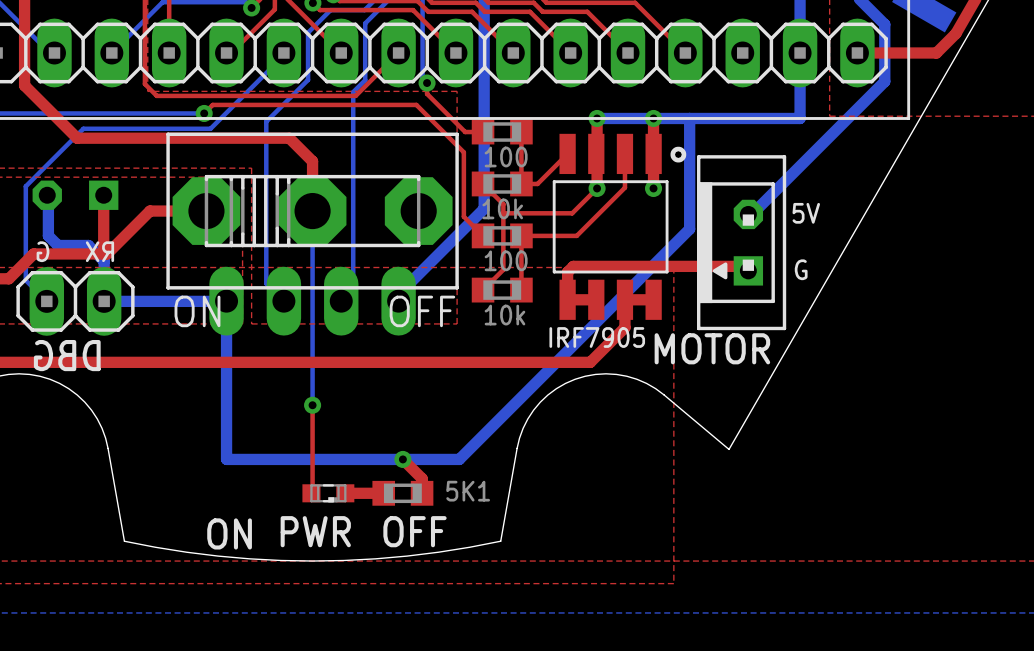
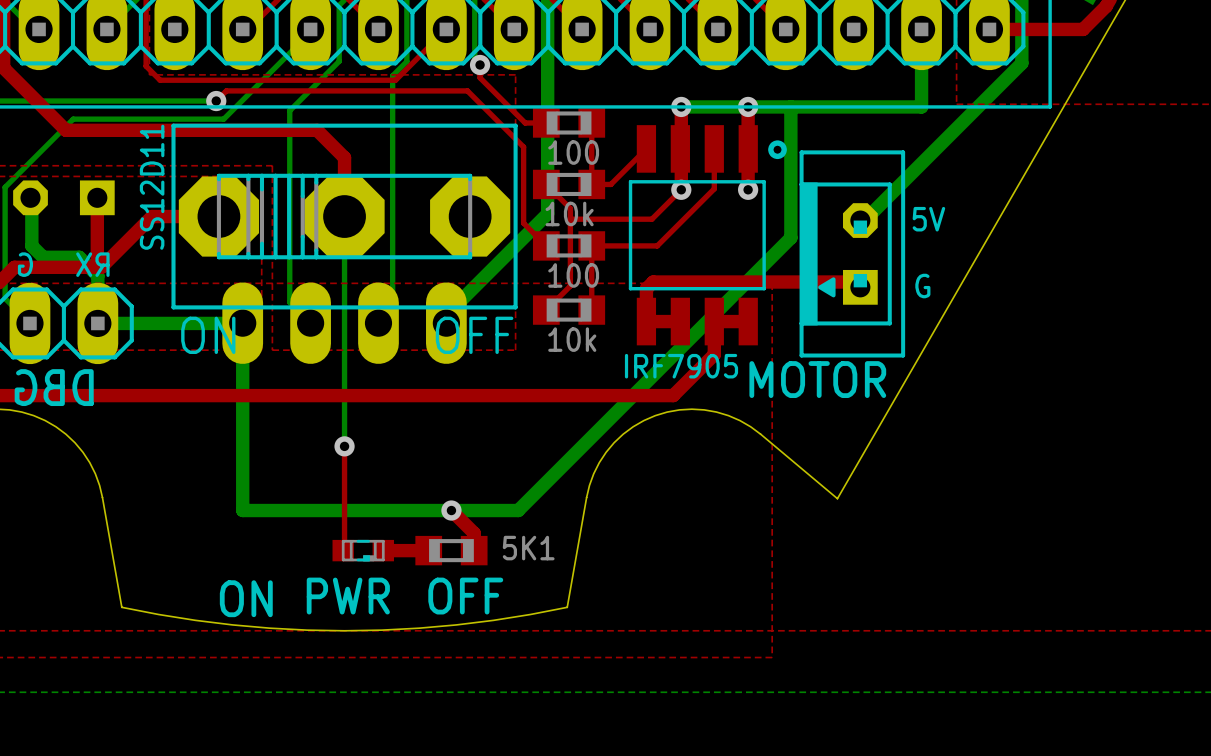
text: none -> SS12D11 (152, 187)

